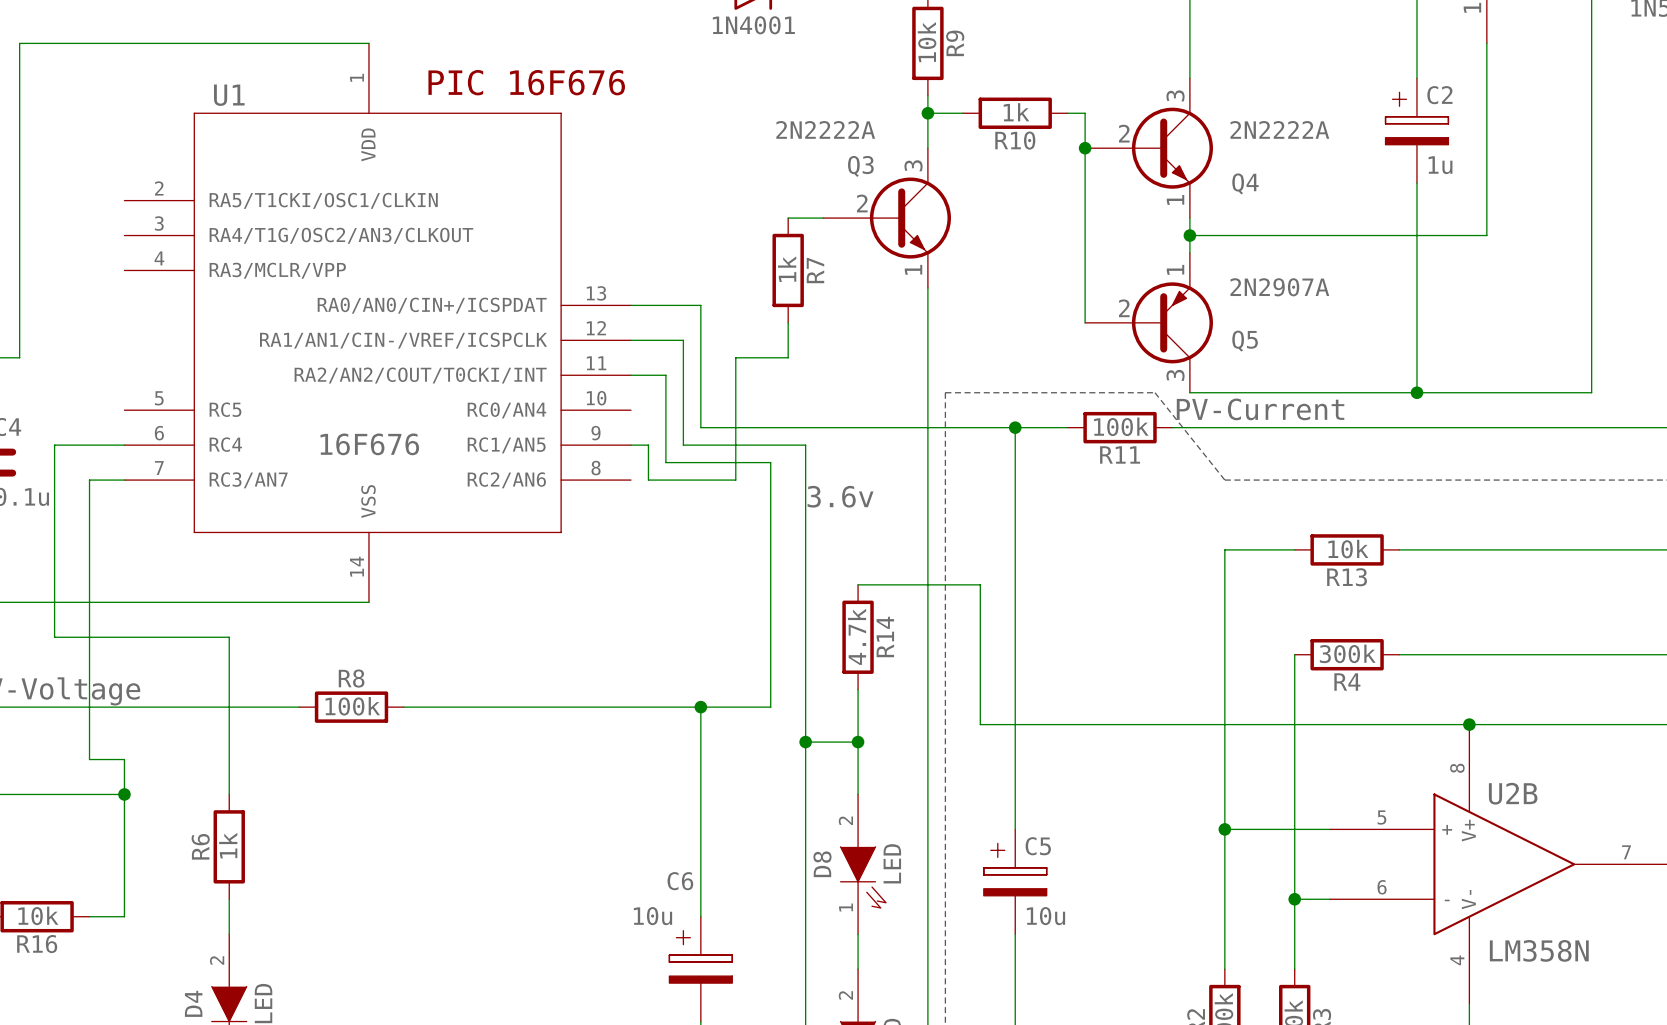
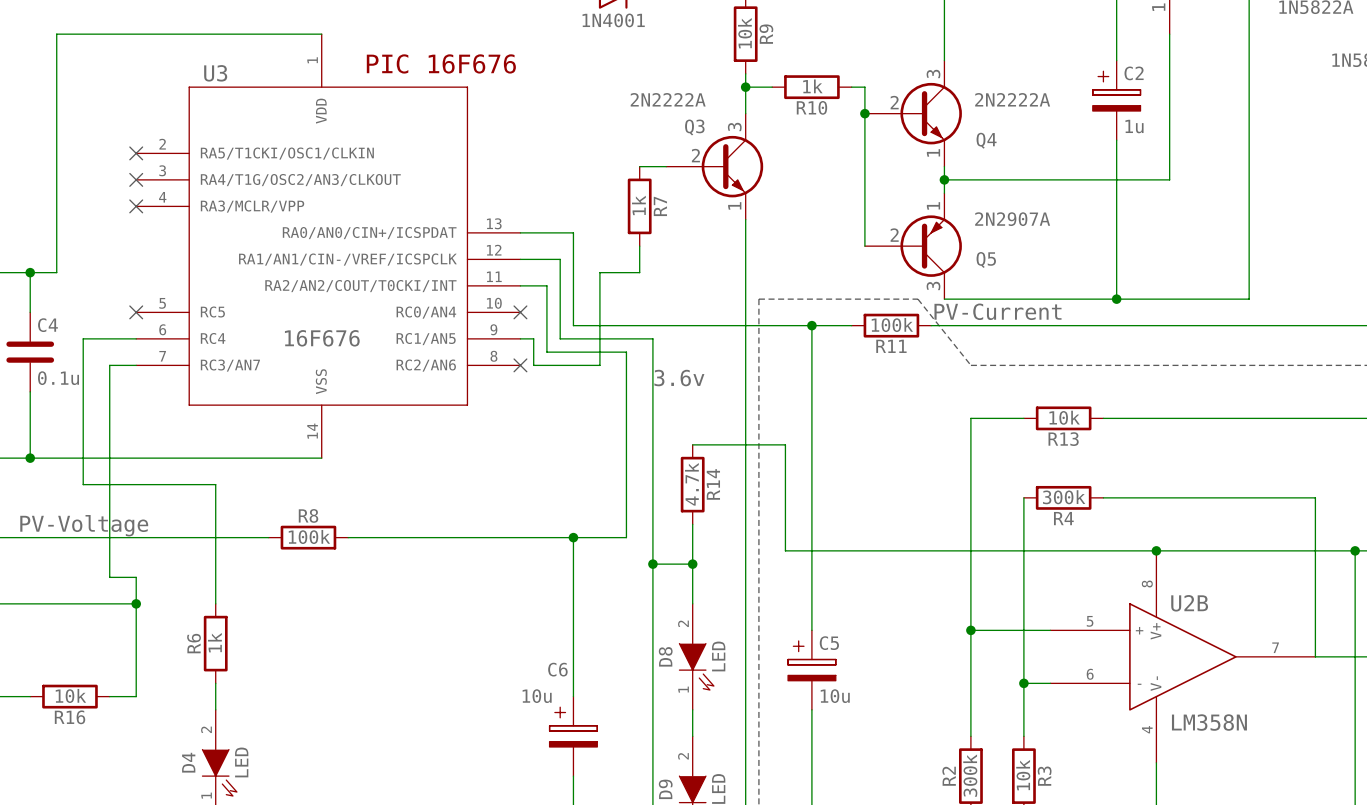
U1 name: U1 (229, 95) -> U3 (215, 73)
no-connect mark: none -> (136, 153)
no-connect mark: none -> (136, 179)
no-connect mark: none -> (136, 206)
no-connect mark: none -> (136, 312)
no-connect mark: none -> (520, 312)
no-connect mark: none -> (520, 365)

